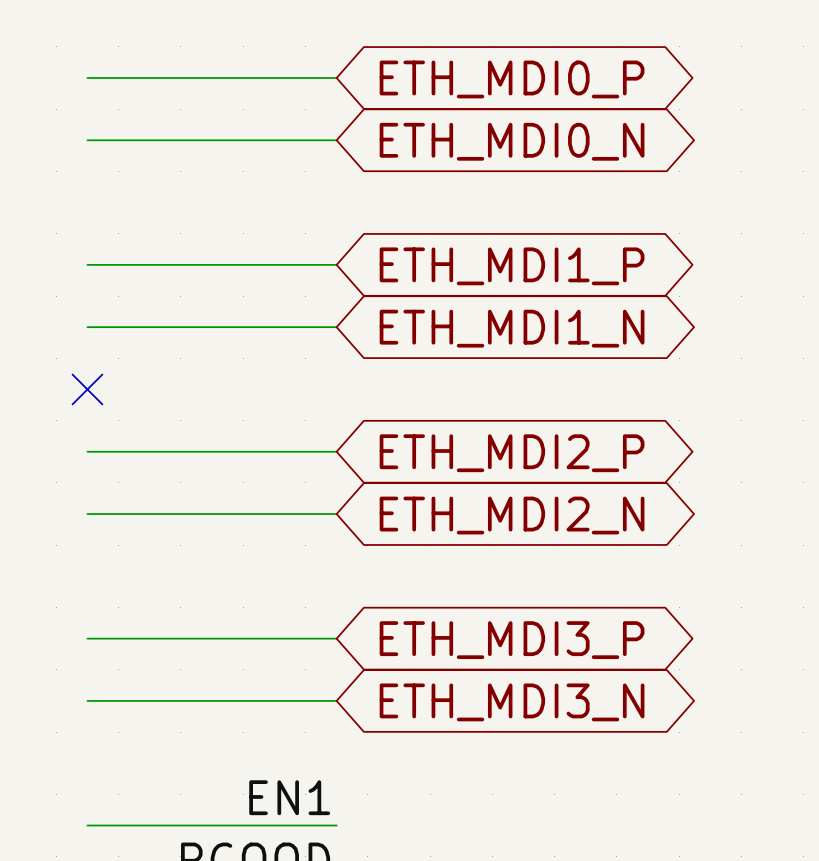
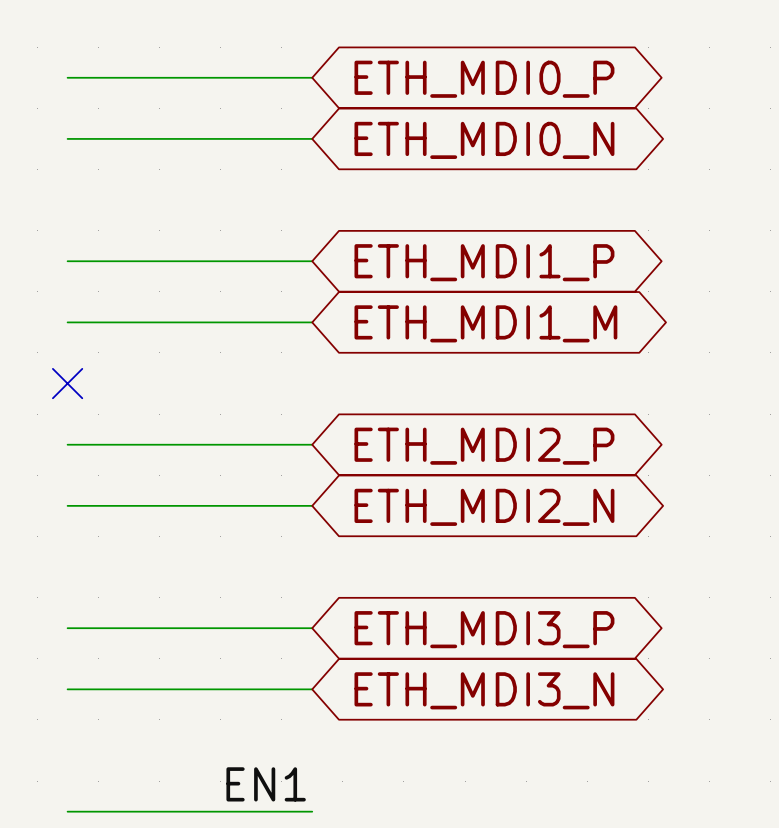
global label: ETH_MDI1_N (512, 328) -> ETH_MDI1_M (485, 323)

